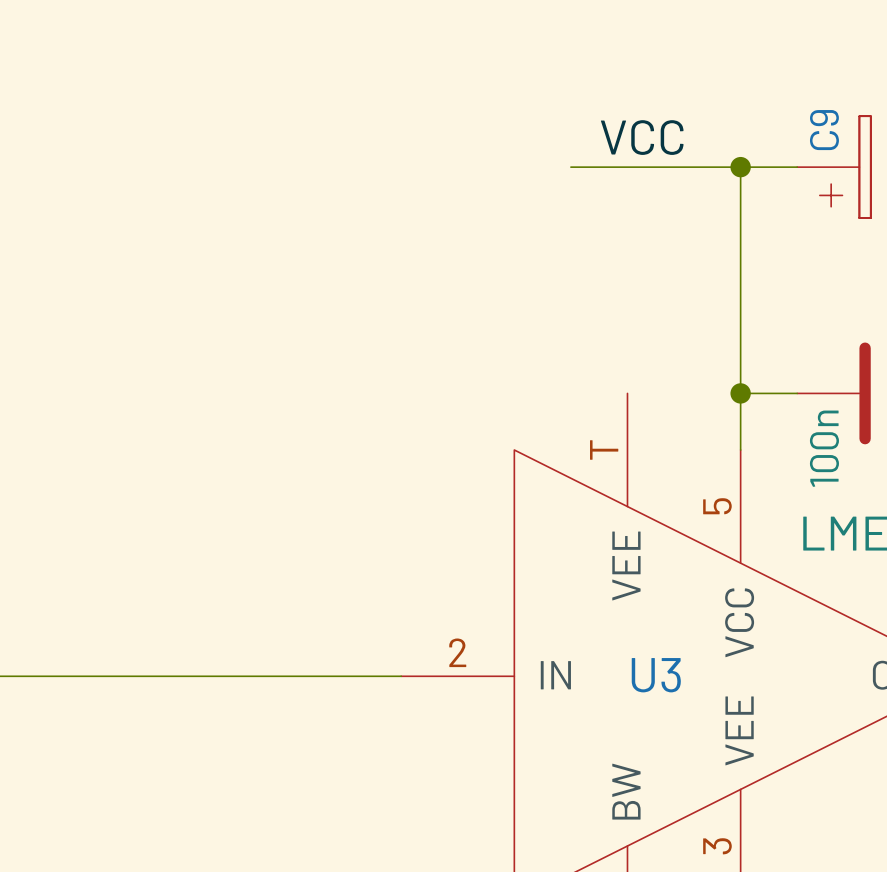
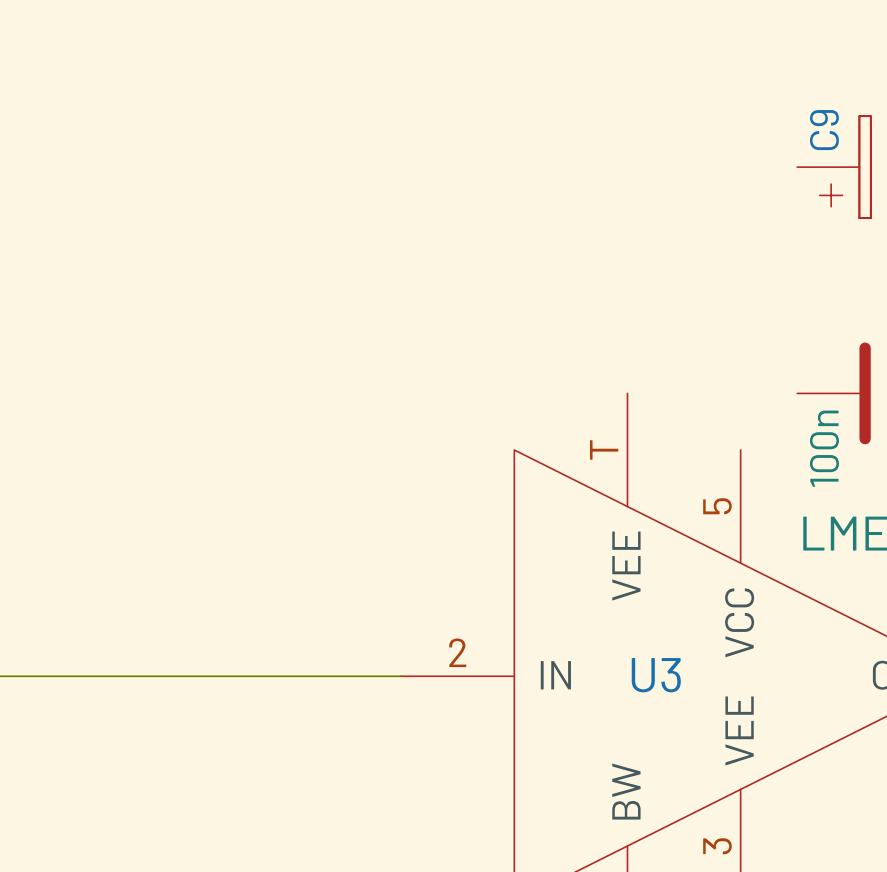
label: VCC (642, 137) -> none
wire: (570, 167) (797, 167) -> none
wire: (740, 167) (740, 449) -> none
junction: (740, 167) -> none
wire: (740, 393) (797, 393) -> none
junction: (740, 393) -> none

